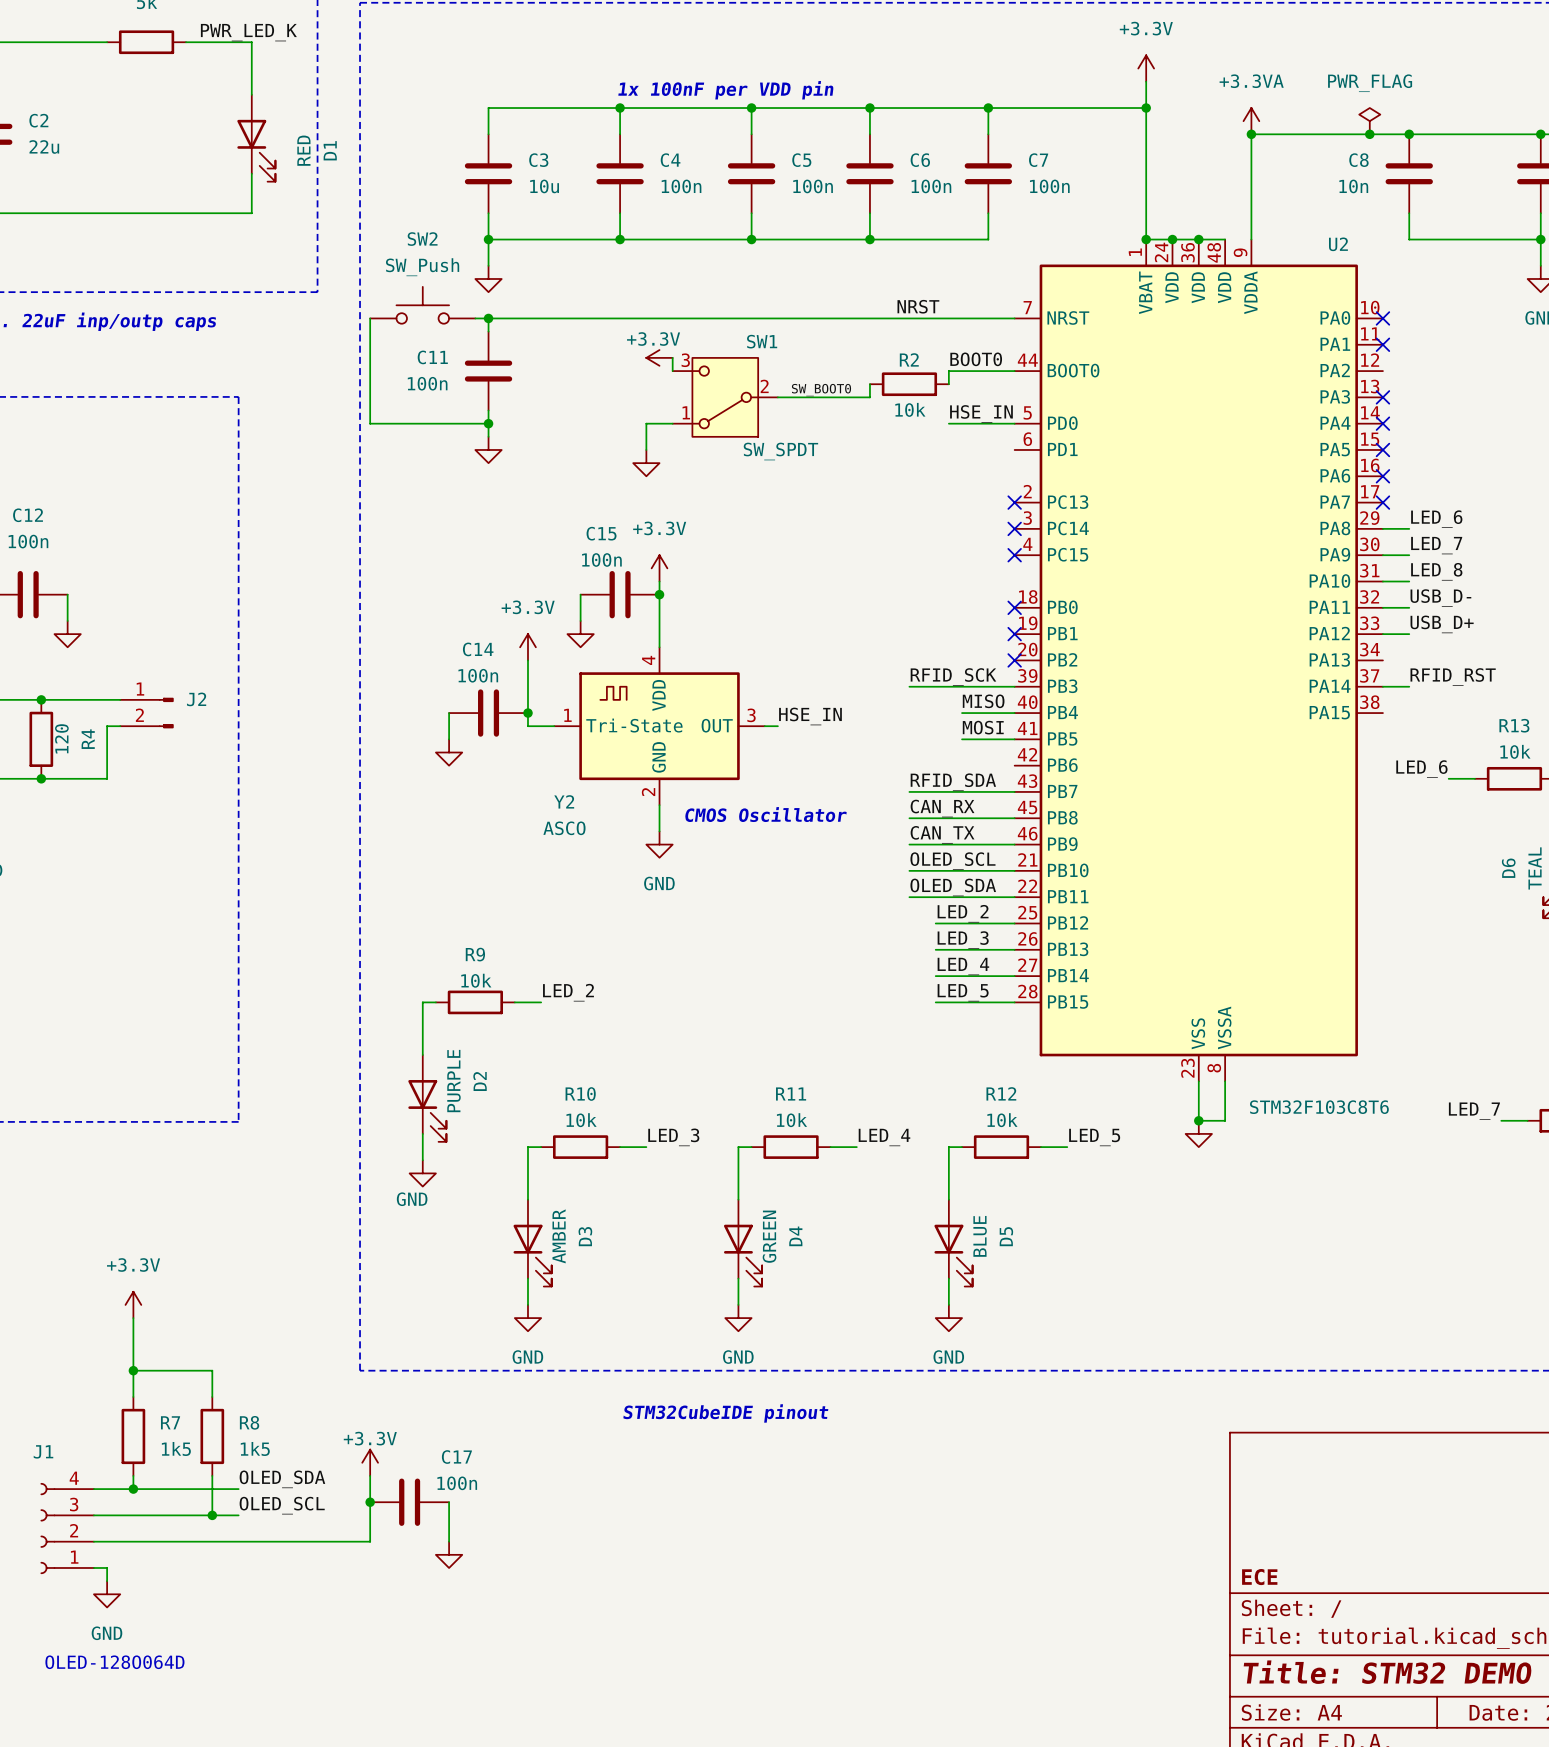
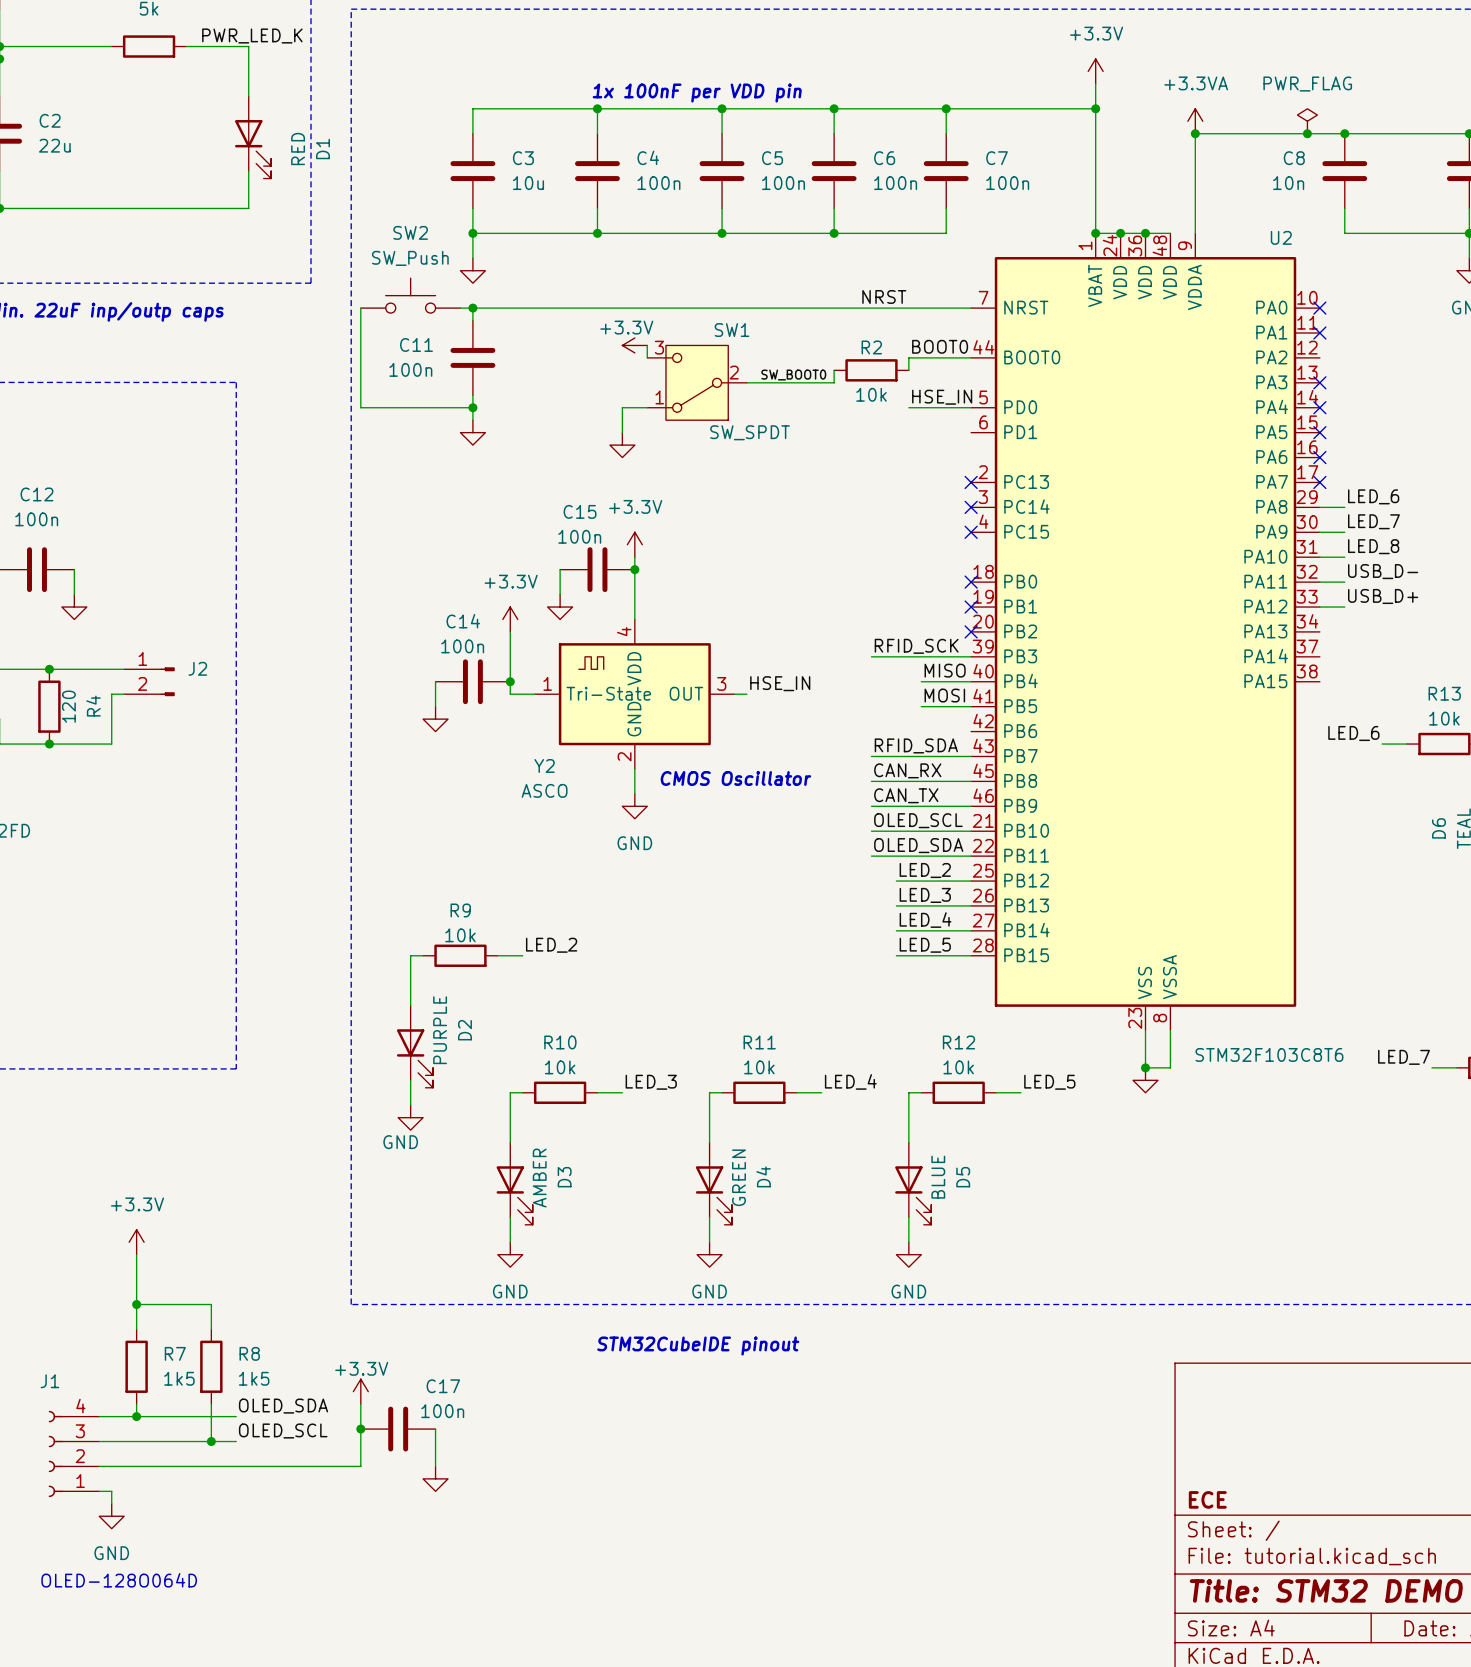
label: RFID_RST (1453, 677) -> none
wire: (1382, 686) (1409, 686) -> none

